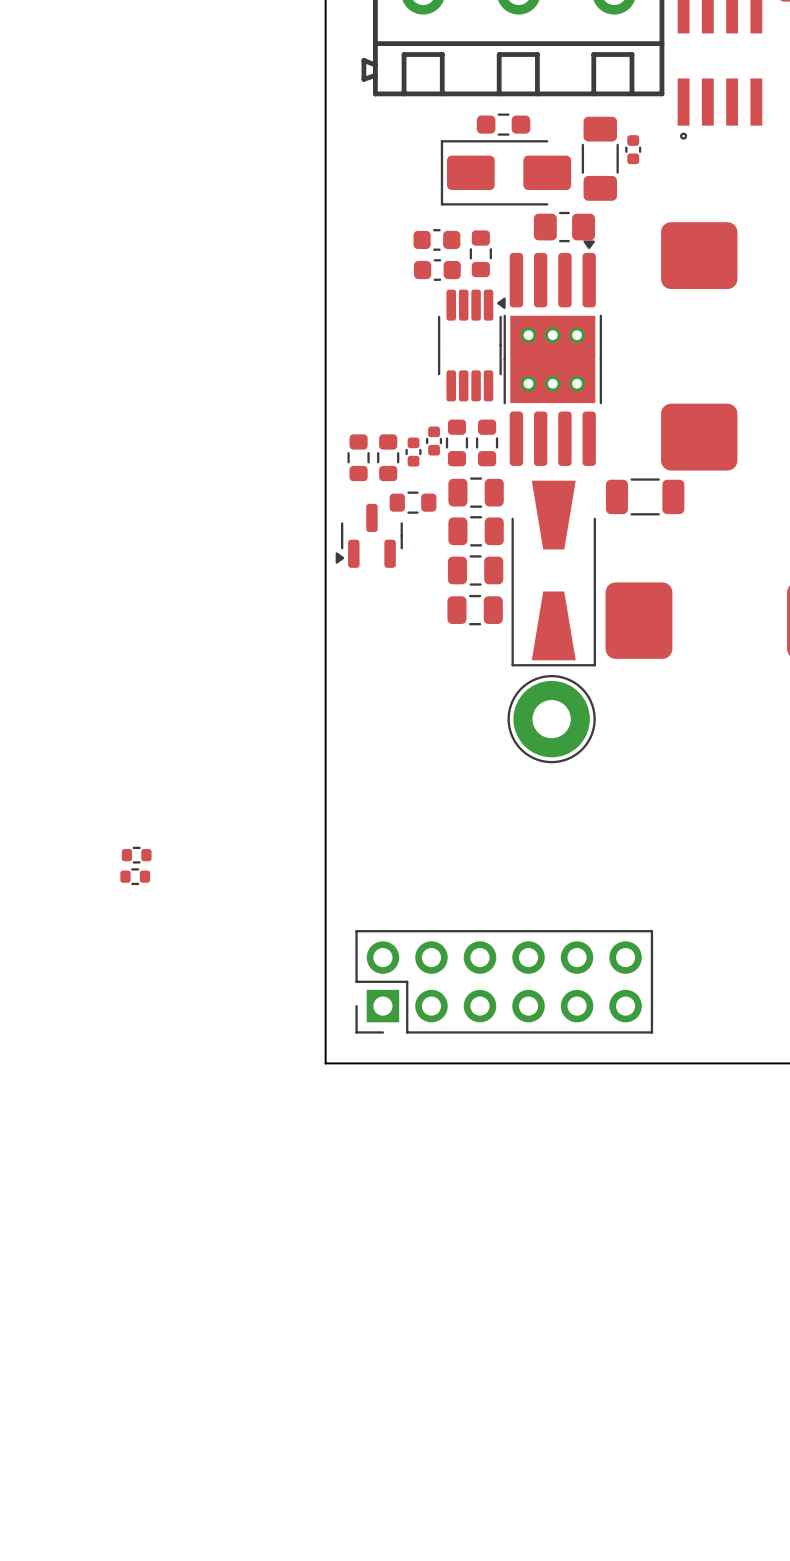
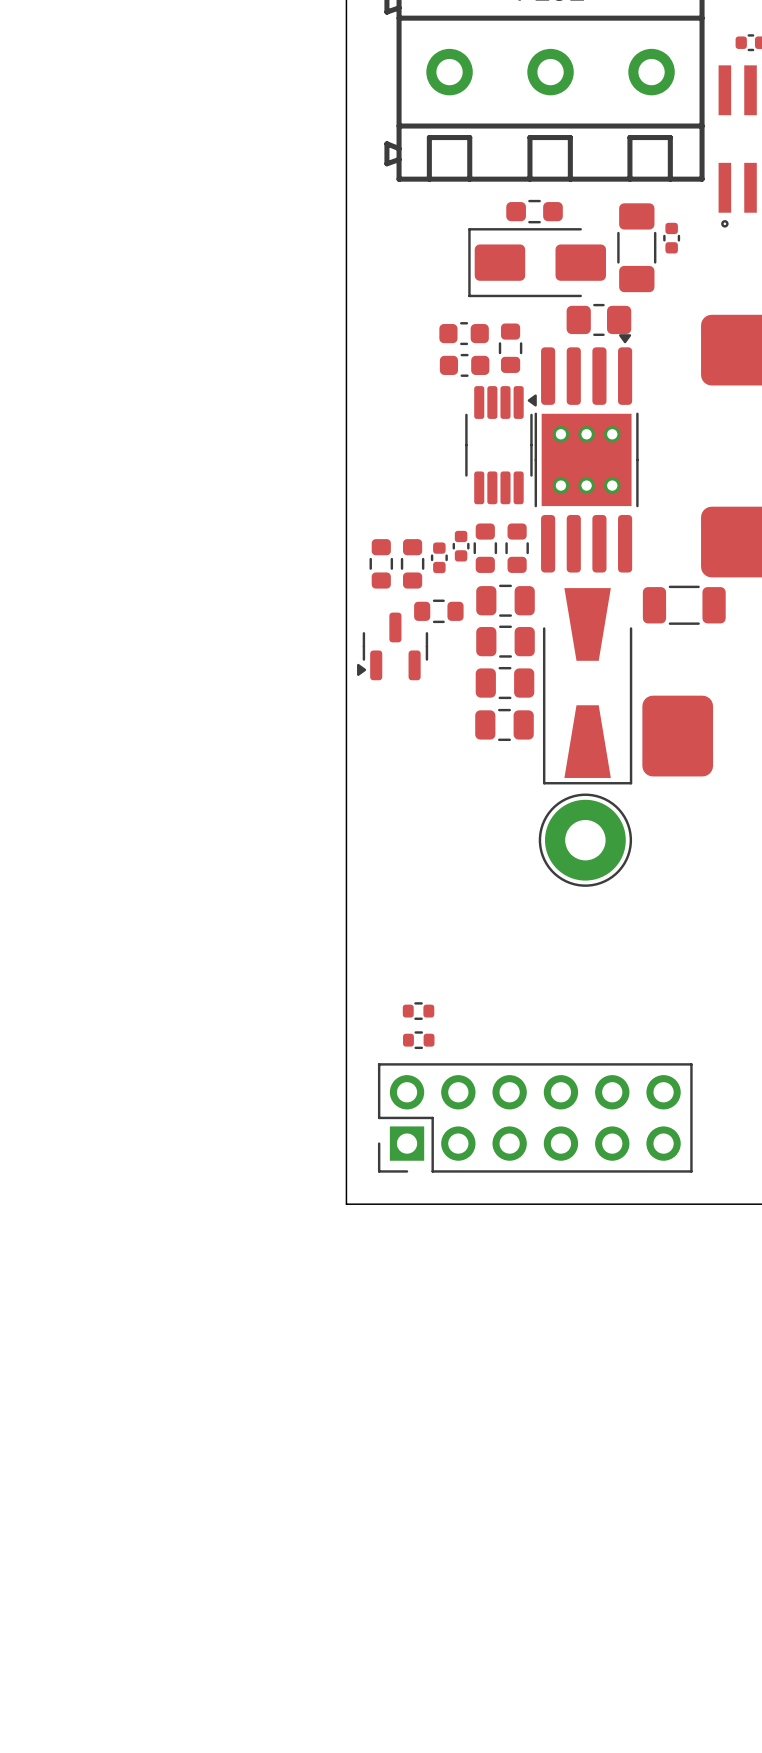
part: (136, 855) -> none
part: (135, 876) -> none
part: none -> (418, 1011)
part: none -> (418, 1040)

